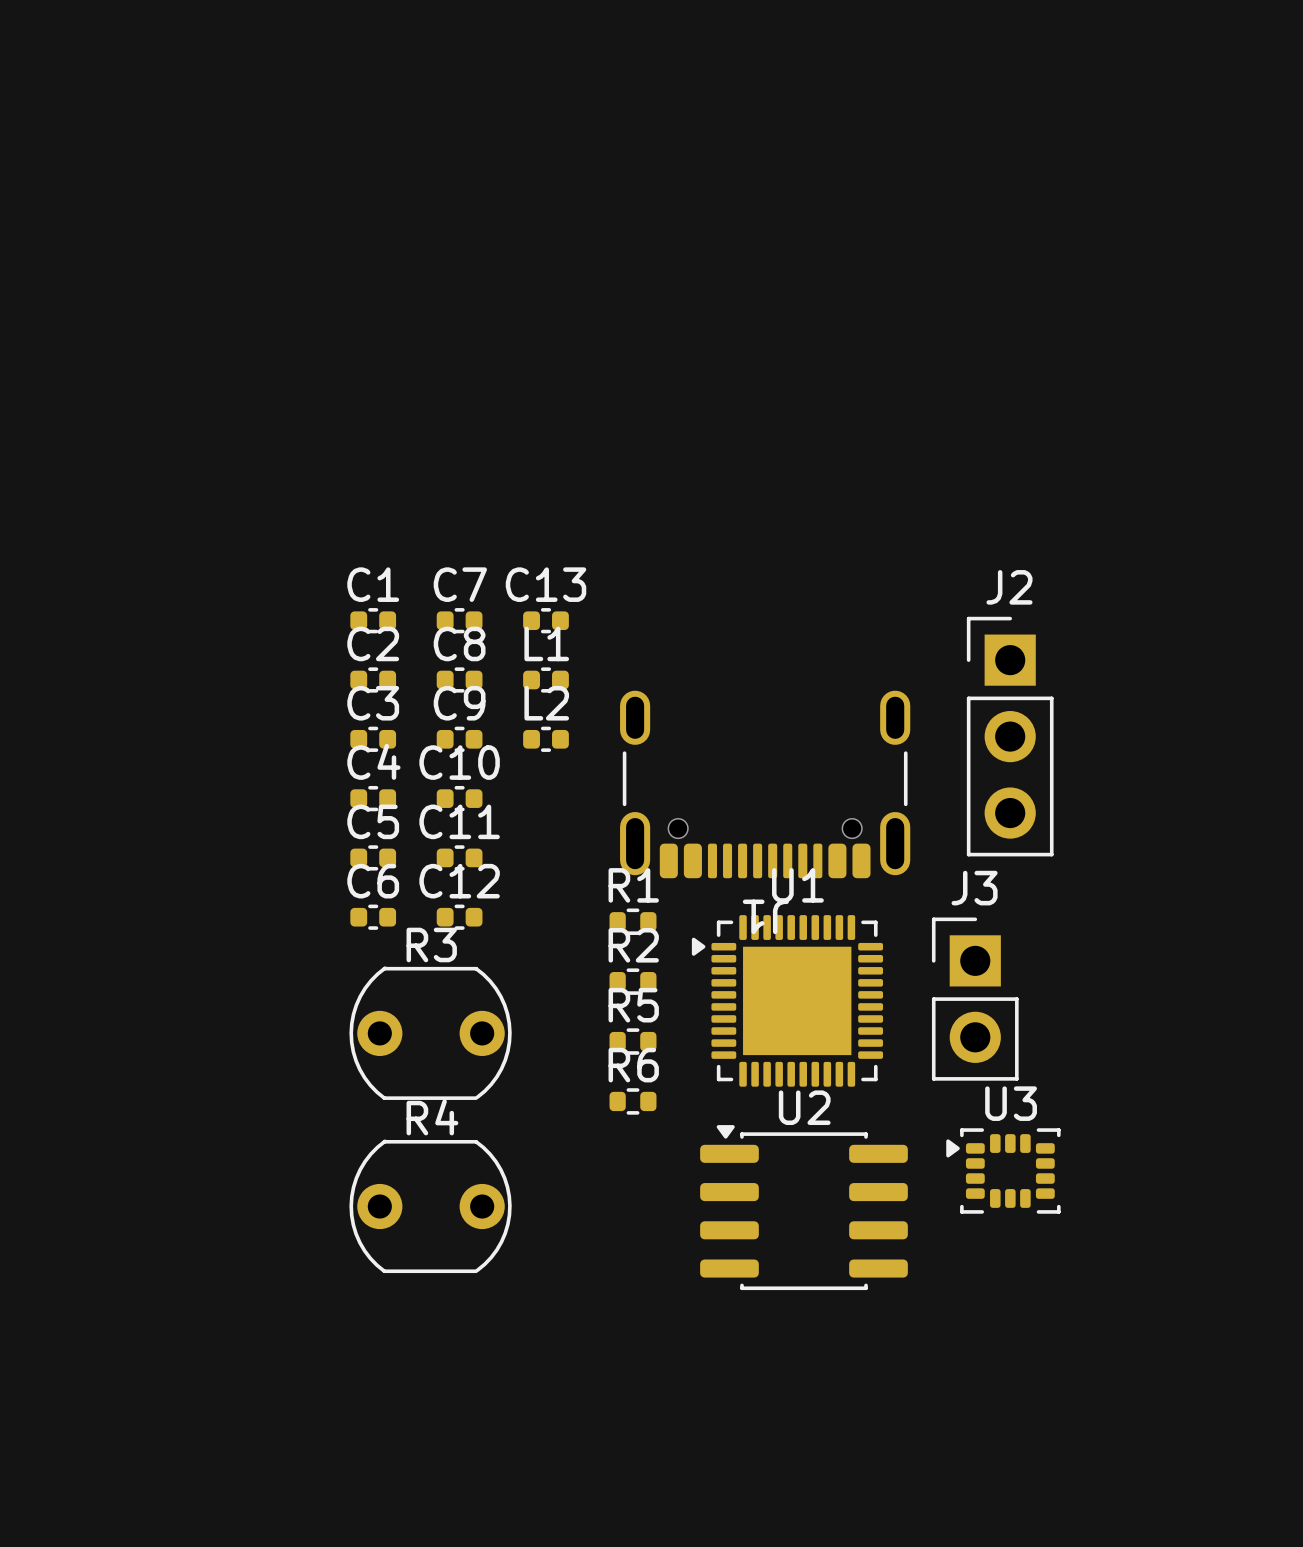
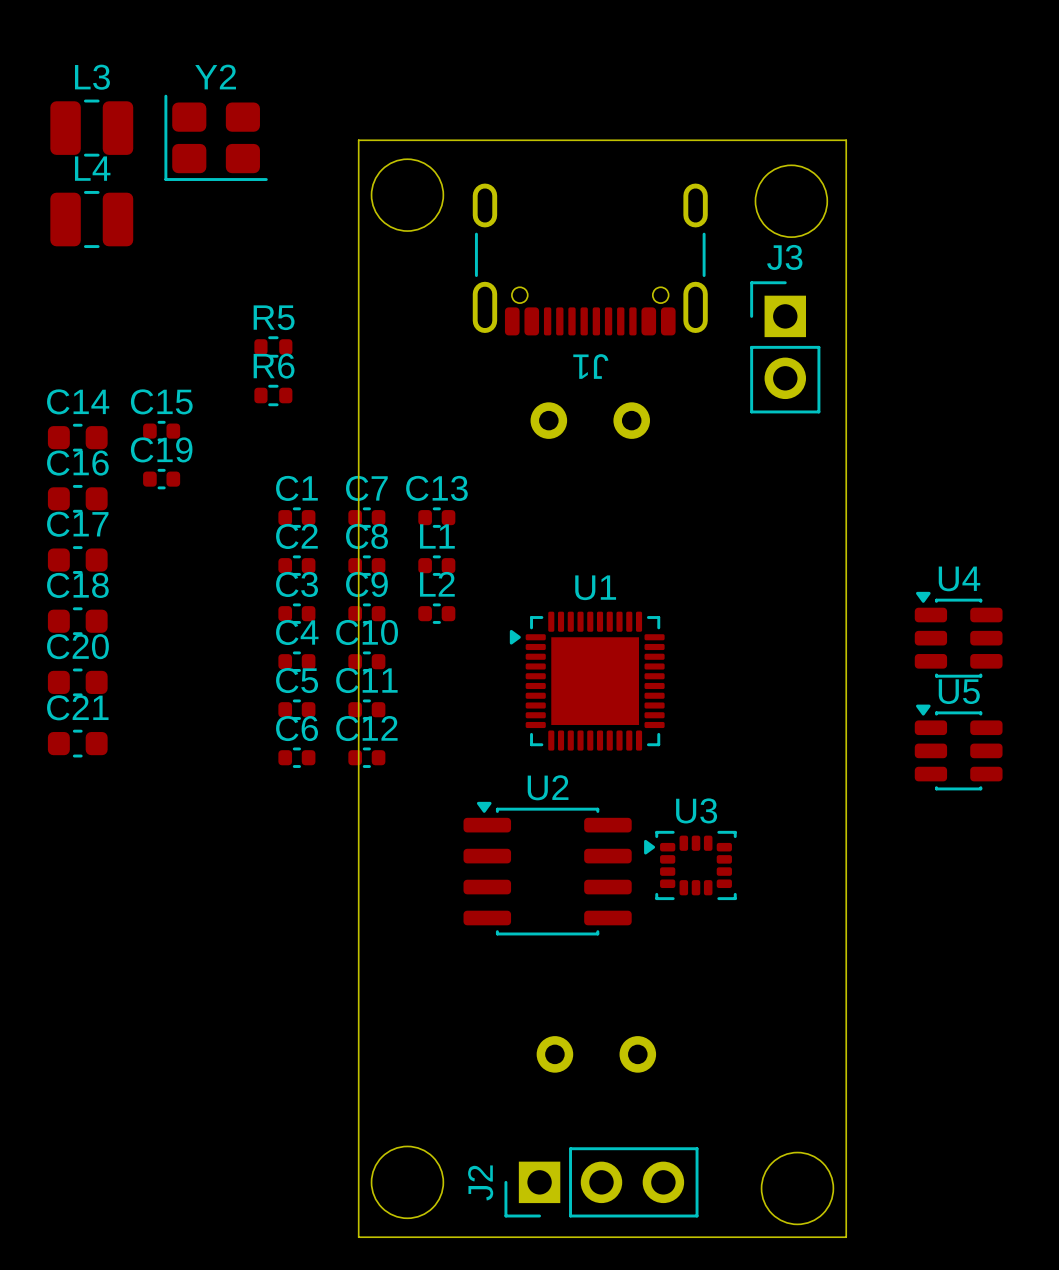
L3: none -> (91, 128)
Y2: none -> (216, 137)
board edge: none -> (358, 140) (846, 140) (846, 1237) (358, 1237) (358, 140)
round board edge: none -> [370, 158, 444, 232]
round board edge: none -> [754, 164, 828, 238]
L4: none -> (91, 219)
C15: none -> (161, 431)
C14: none -> (77, 437)
C19: none -> (161, 479)
C16: none -> (77, 498)
C17: none -> (77, 560)
J2 rotation: 0° (1010, 736) -> 90° counterclockwise (601, 1182)
J2 position: (1010, 736) -> (601, 1182)
C18: none -> (77, 621)
U4: none -> (958, 634)
J1 position: (765, 784) -> (590, 259)
C20: none -> (77, 682)
C21: none -> (77, 743)
U5: none -> (958, 747)
R1: (633, 921) -> none
R2: (633, 981) -> none
J3 position: (975, 999) -> (785, 347)
U1 position: (787, 1000) -> (587, 681)
R3 side: top (430, 1033) -> bottom (590, 420)
R5 position: (633, 1041) -> (273, 346)
R6 position: (633, 1101) -> (273, 395)
U3 position: (1003, 1170) -> (690, 865)
R4 side: top (430, 1206) -> bottom (596, 1054)
U2 position: (803, 1207) -> (547, 868)
round board edge: none -> [370, 1145, 444, 1219]
round board edge: none -> [760, 1151, 834, 1225]

